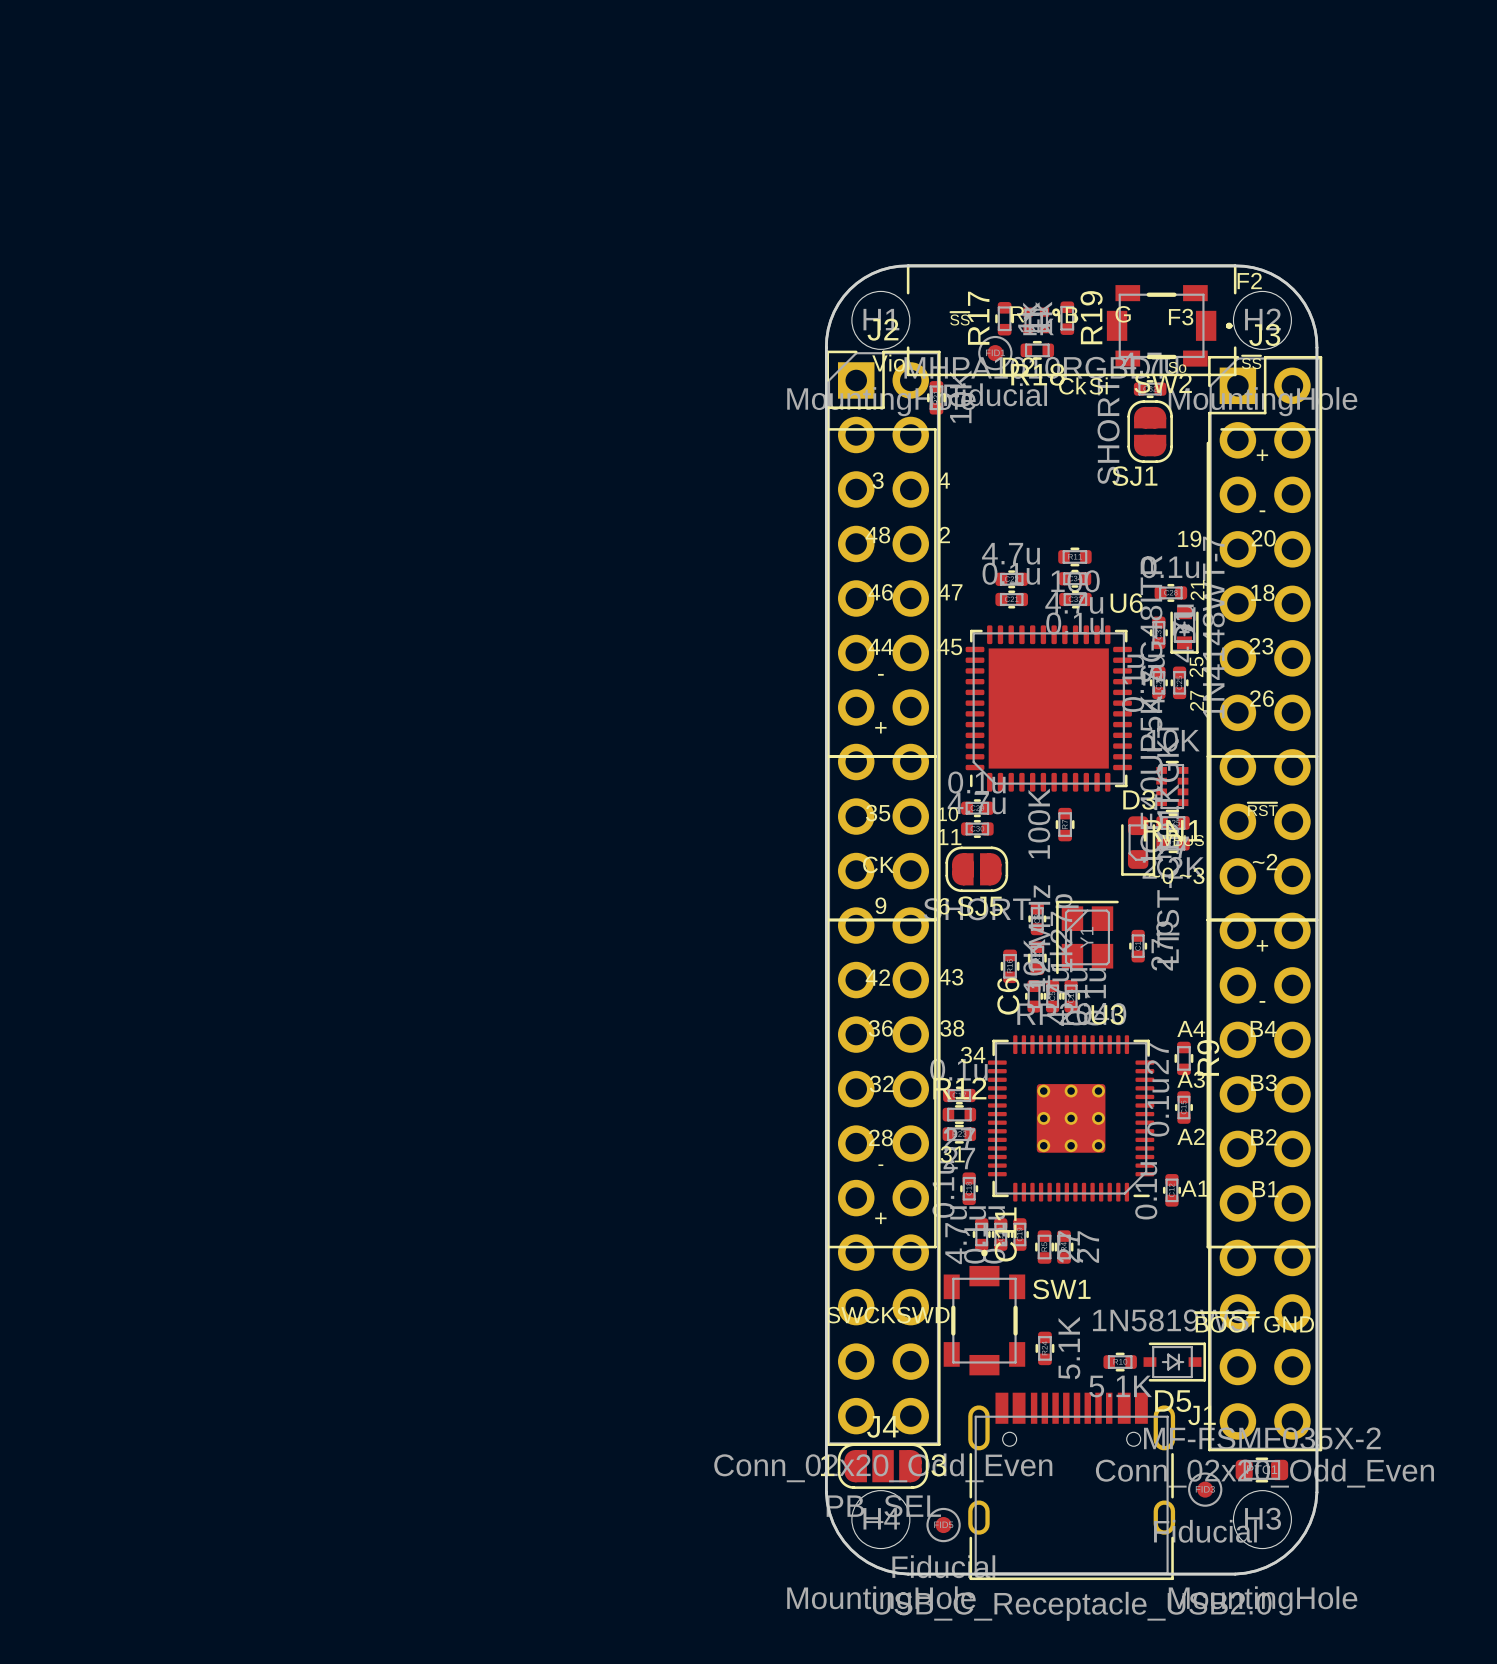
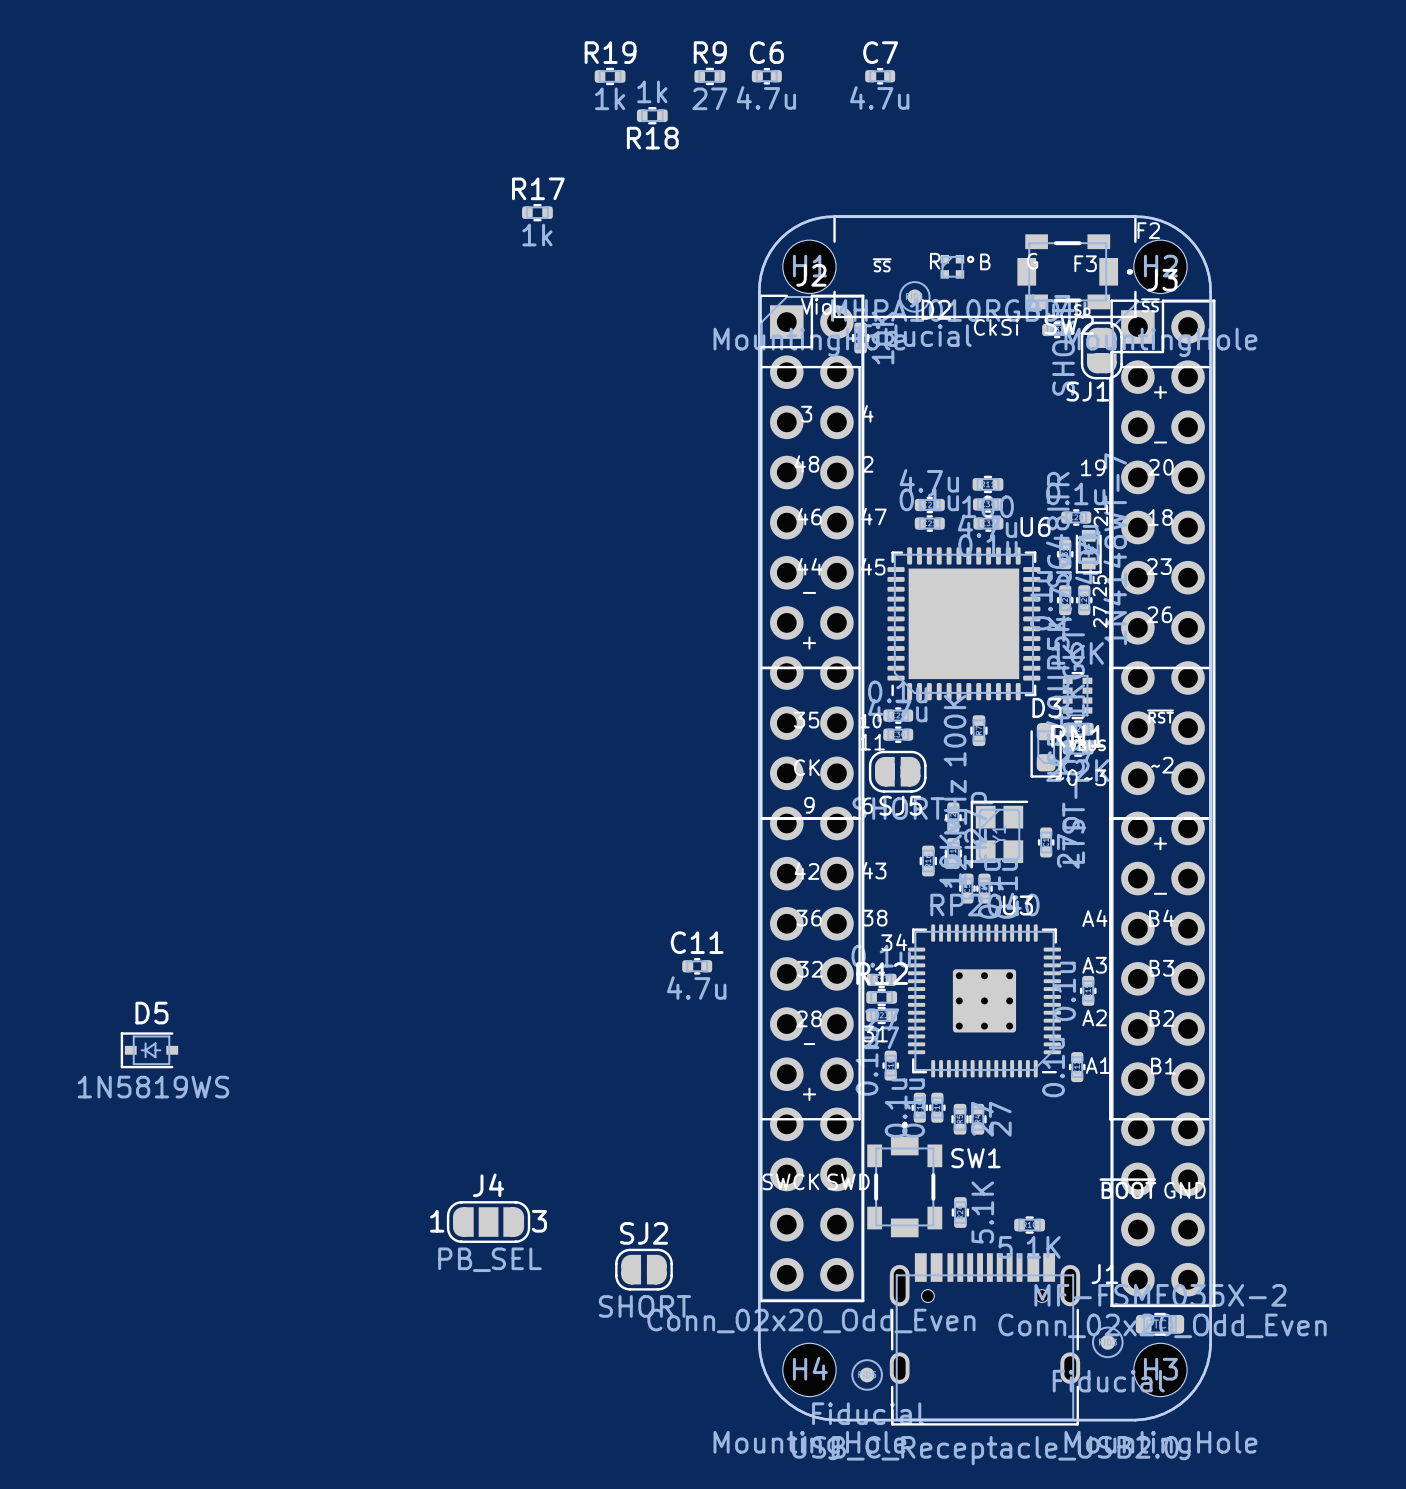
C7: none -> 4.7u (880, 76)
R17 rotation: 0° (1004, 318) -> 90° clockwise (537, 212)
R17 position: (1004, 318) -> (537, 212)
R19 rotation: 0° (1067, 318) -> 90° clockwise (610, 76)
R19 position: (1067, 318) -> (610, 76)
R18 position: (1037, 350) -> (652, 115)
SJ1 position: (1150, 431) -> (1101, 350)
C6 rotation: 0° (1034, 996) -> 90° clockwise (766, 76)
C6 position: (1034, 996) -> (766, 76)
R9 rotation: 0° (1183, 1058) -> 90° clockwise (709, 76)
R9 position: (1183, 1058) -> (709, 76)
C11 rotation: 0° (981, 1234) -> 90° clockwise (697, 966)
C11 position: (981, 1234) -> (697, 966)
D5 rotation: 0° (1174, 1362) -> 180° (149, 1050)
D5 position: (1174, 1362) -> (149, 1050)
SJ2: none -> SHORT (643, 1269)
J4 position: (883, 1466) -> (488, 1222)

